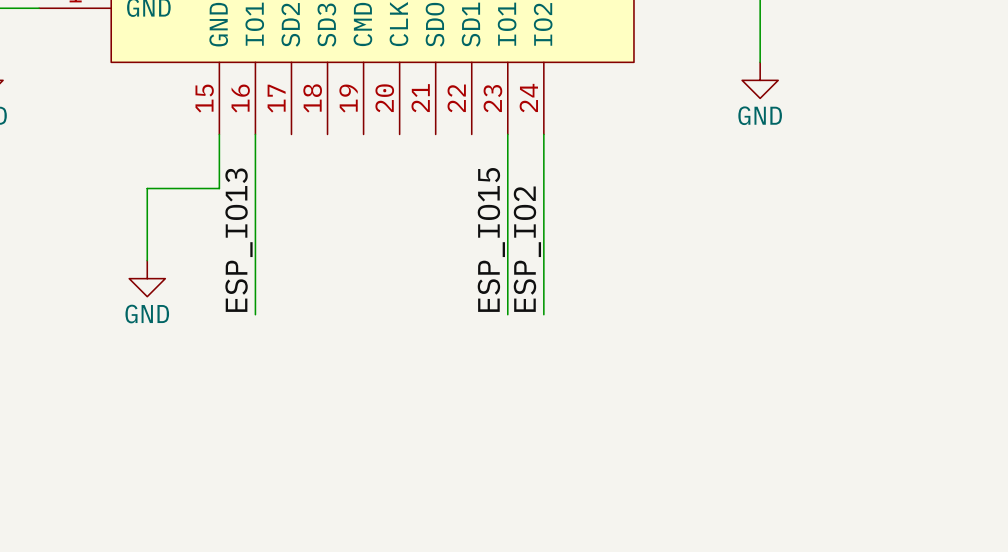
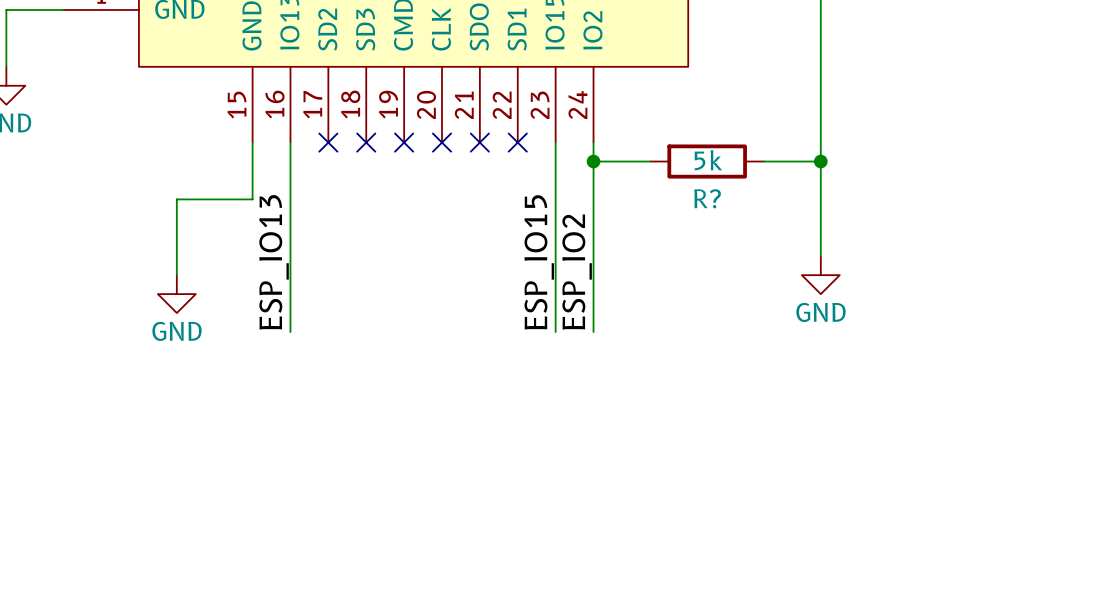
wire: none -> (820, 66) (820, 256)
power symbol position: GND (760, 80) -> GND (820, 275)
no-connect mark: none -> (328, 142)
no-connect mark: none -> (366, 142)
no-connect mark: none -> (404, 142)
no-connect mark: none -> (442, 142)
no-connect mark: none -> (479, 142)
no-connect mark: none -> (517, 142)
wire: none -> (593, 161) (650, 161)
junction: none -> (593, 161)
R?: none -> 5k (707, 161)
wire: none -> (763, 161) (820, 161)
junction: none -> (820, 161)

